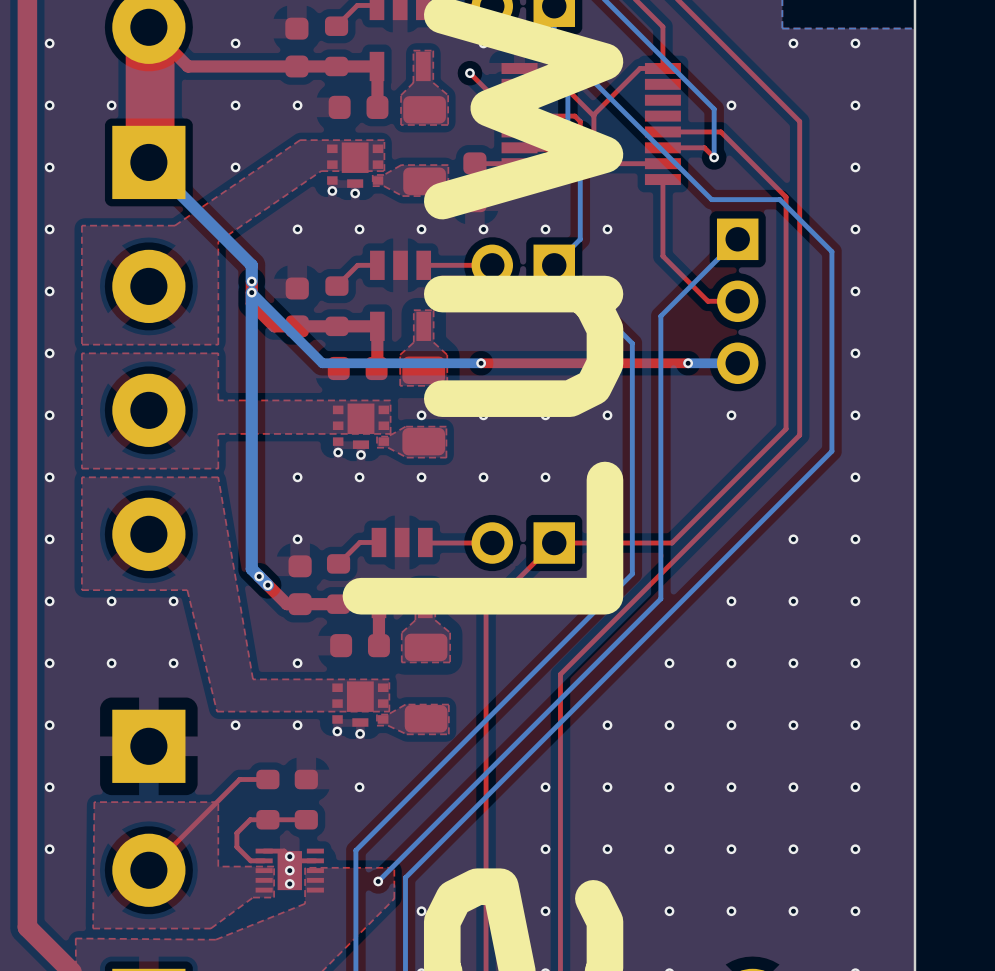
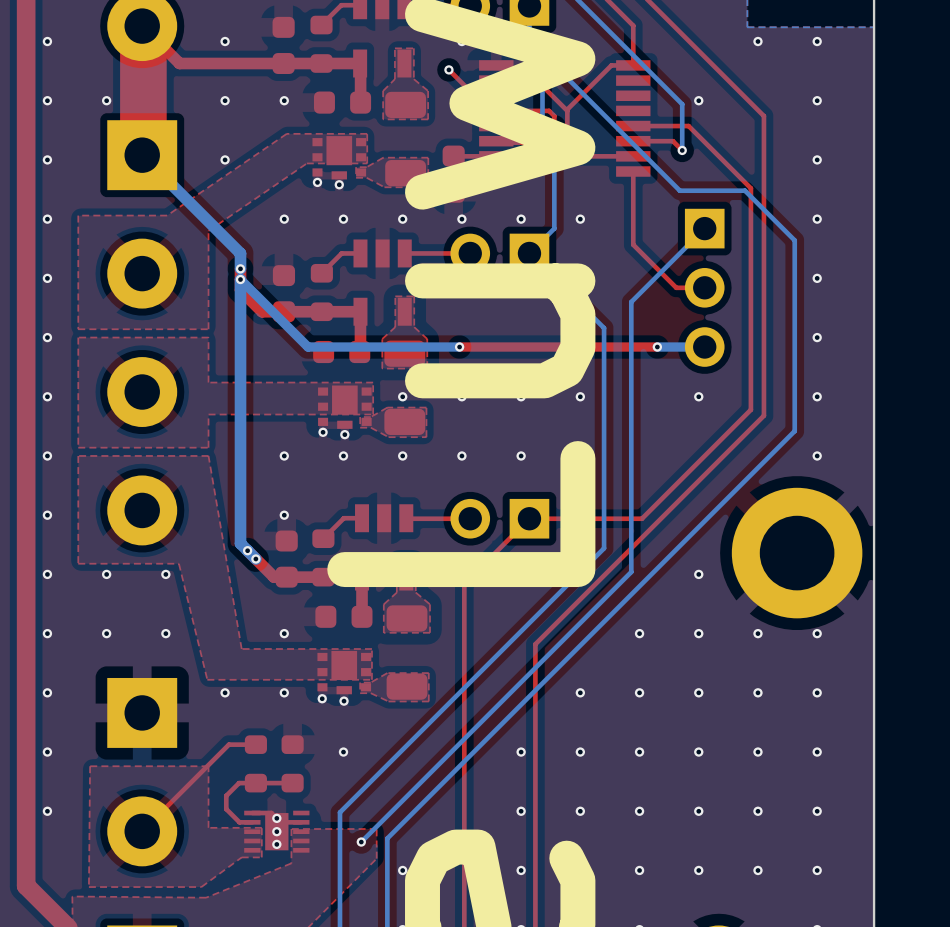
via: (793, 539) -> none
via: (855, 539) -> none
part: none -> (797, 553)
via: (793, 601) -> none
via: (855, 601) -> none

